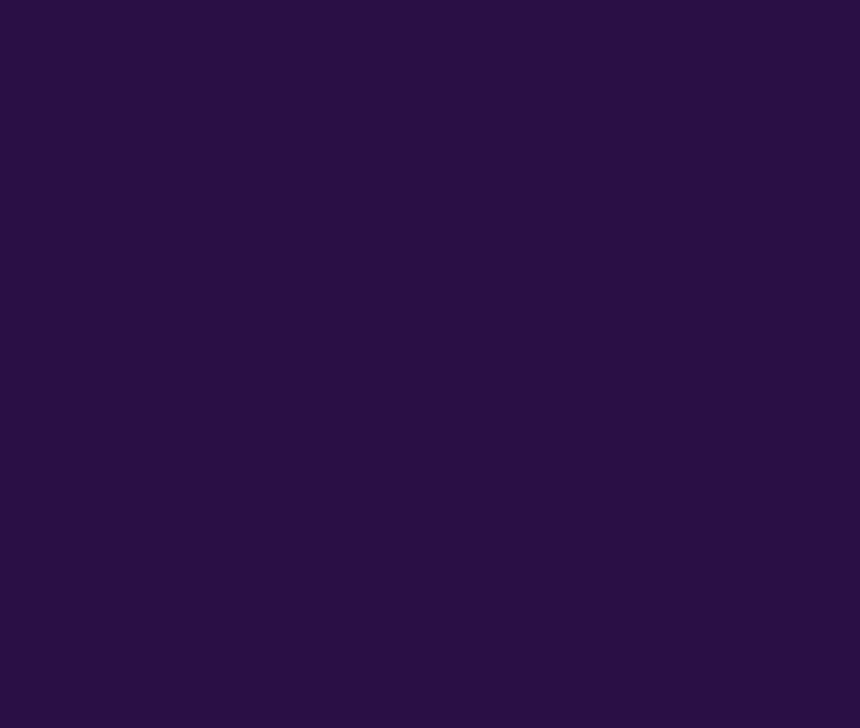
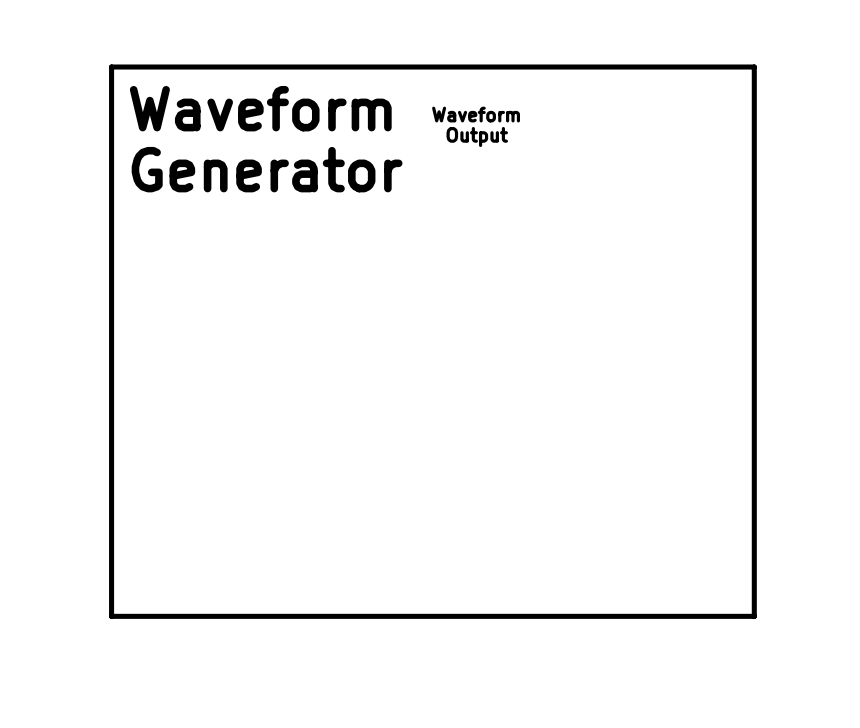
line: none -> (111, 67) (754, 67) (754, 616) (111, 616) (111, 67)
text: none -> Waveform (260, 108)
text: none -> Waveform (476, 114)
text: none -> Output (477, 136)
text: none -> Generator (267, 169)

